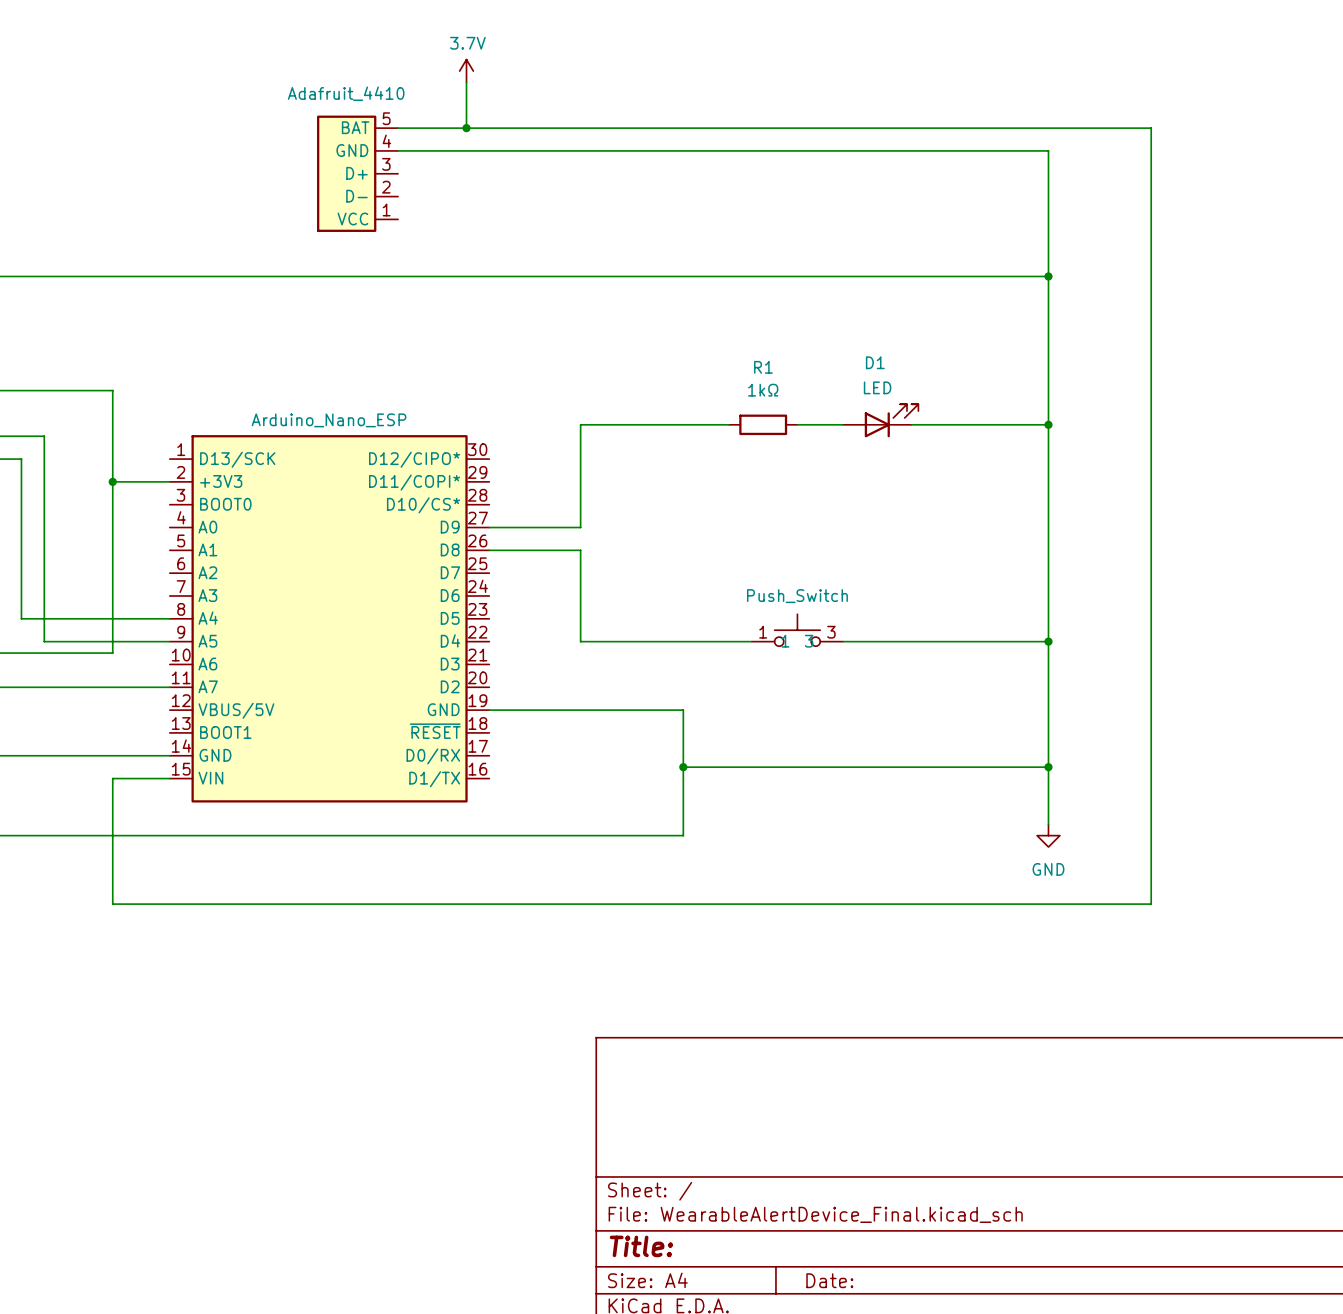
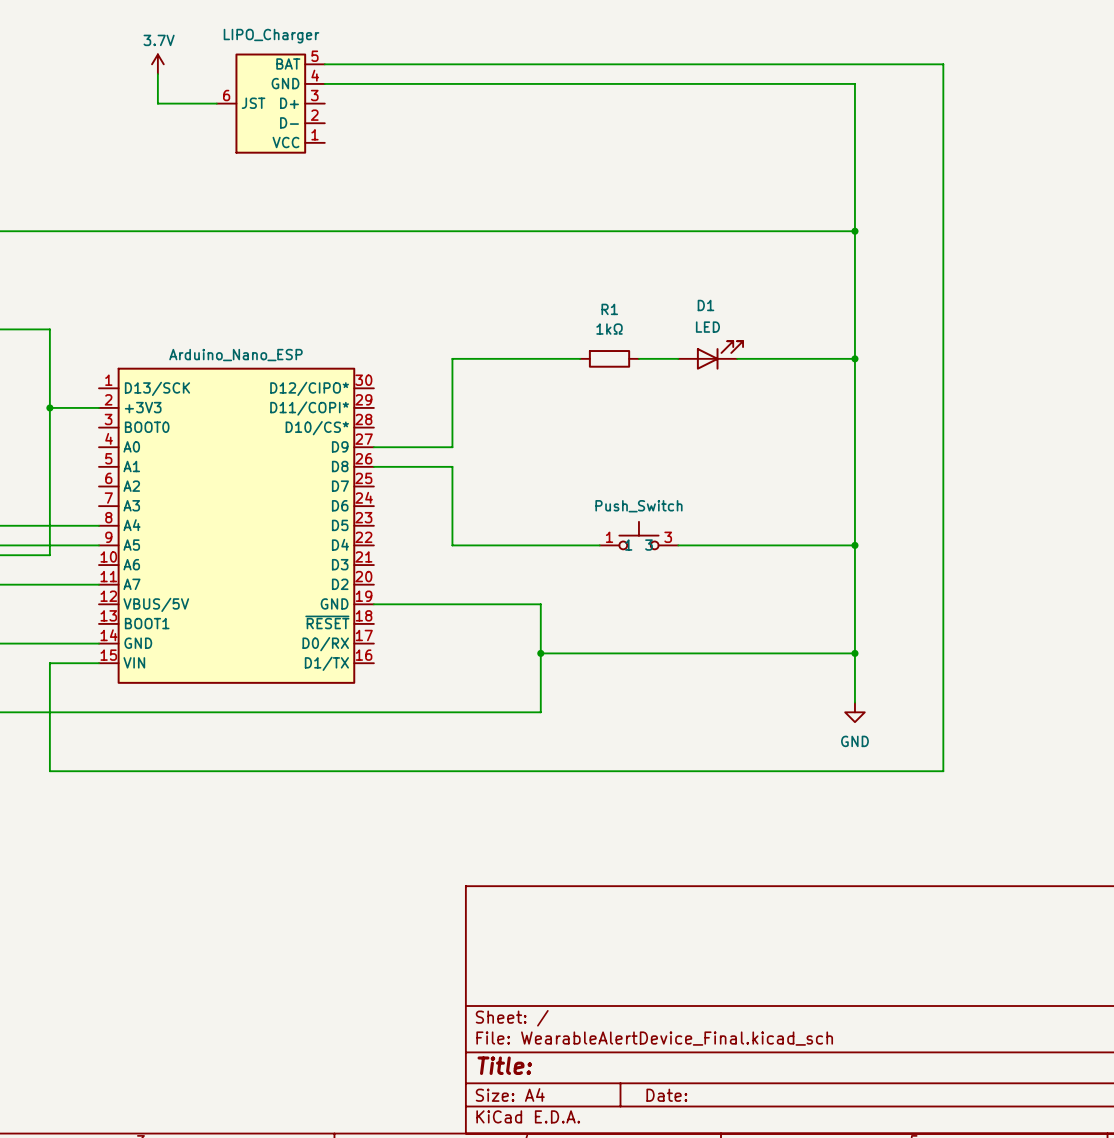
power symbol: 3.7V (466, 71) -> none
power symbol: none -> 3.7V (157, 64)
wire: (466, 82) (466, 128) -> none
wire: none -> (157, 74) (157, 103) (216, 103)
LIPO_Charger: none -> (270, 103)
wire: (398, 128) (1151, 128) -> (324, 64) (943, 64) (943, 103)
junction: (466, 128) -> none
wire: (398, 150) (1048, 150) -> (324, 83) (854, 83) (854, 123)
Adafruit_4410: (357, 173) -> none

